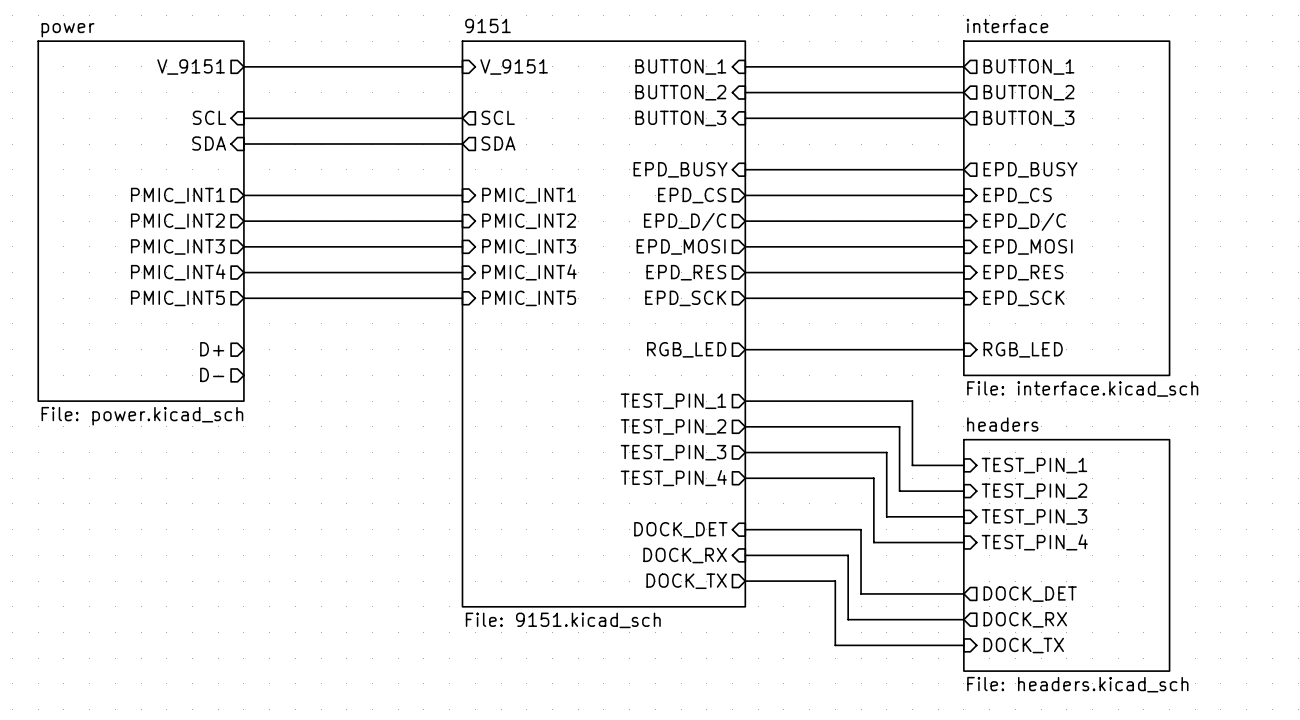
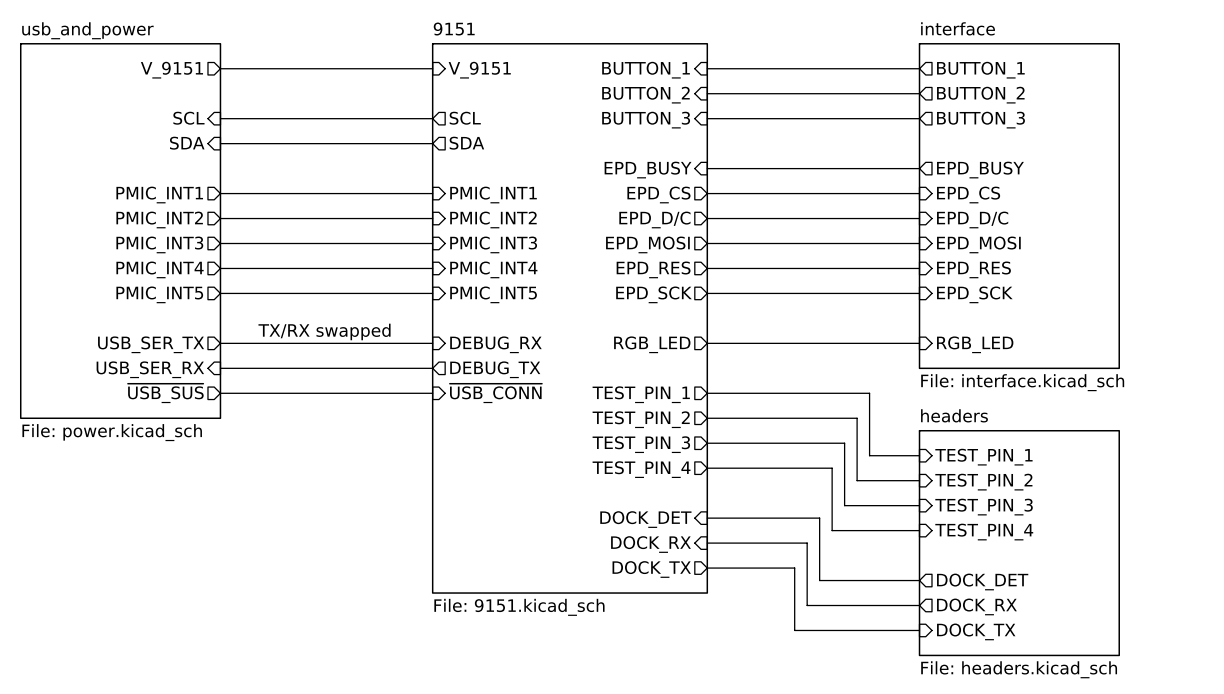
sheet power: File: power.kicad_sch (141, 221) -> none
sheet usb_and_power: none -> File: power.kicad_sch (120, 231)
text: none -> TX/RX swapped (324, 331)
sheet pin: D+ (212, 349) -> USB_SER_TX (151, 344)
wire: none -> (220, 343) (432, 343)
sheet pin: none -> DEBUG_RX (495, 344)
sheet pin shape: output (212, 374) -> input (150, 369)
sheet pin: D- (212, 374) -> USB_SER_RX (150, 369)
wire: none -> (220, 368) (432, 368)
sheet pin: none -> DEBUG_TX (495, 369)
sheet pin: none -> ~{USB_SUS} (165, 393)
sheet pin: none -> ~{USB_CONN} (495, 393)
wire: none -> (220, 393) (432, 393)

